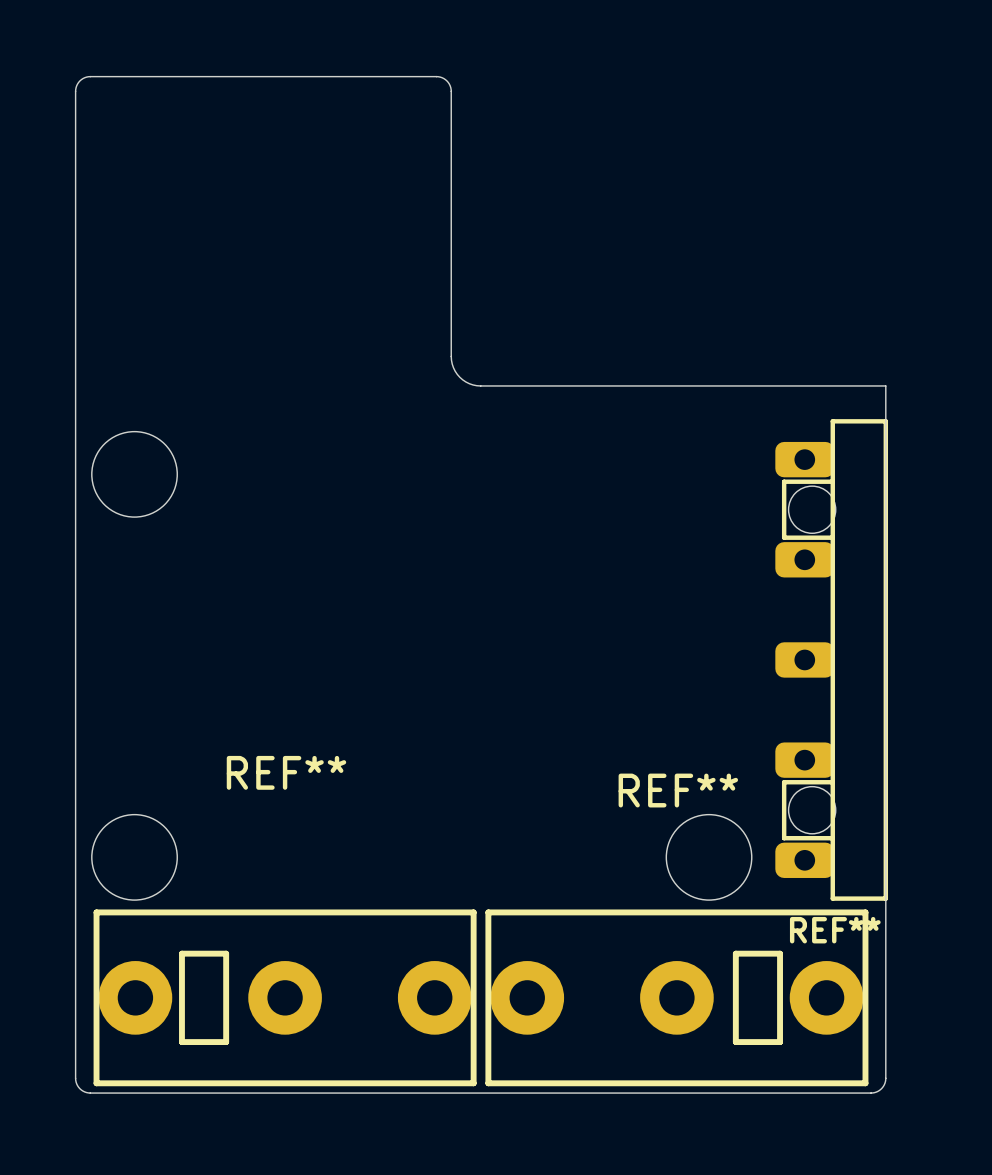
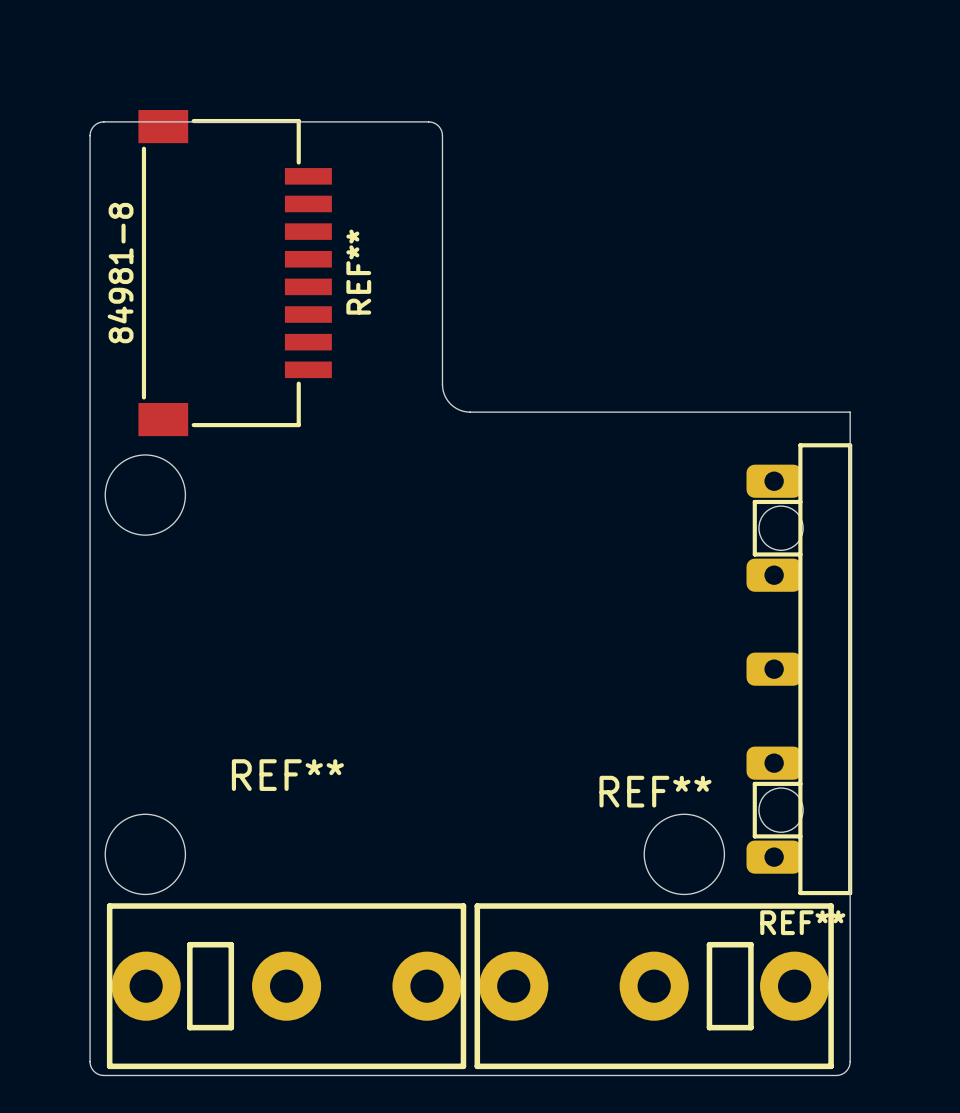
REF**: none -> 84981-8 (235, 273)

